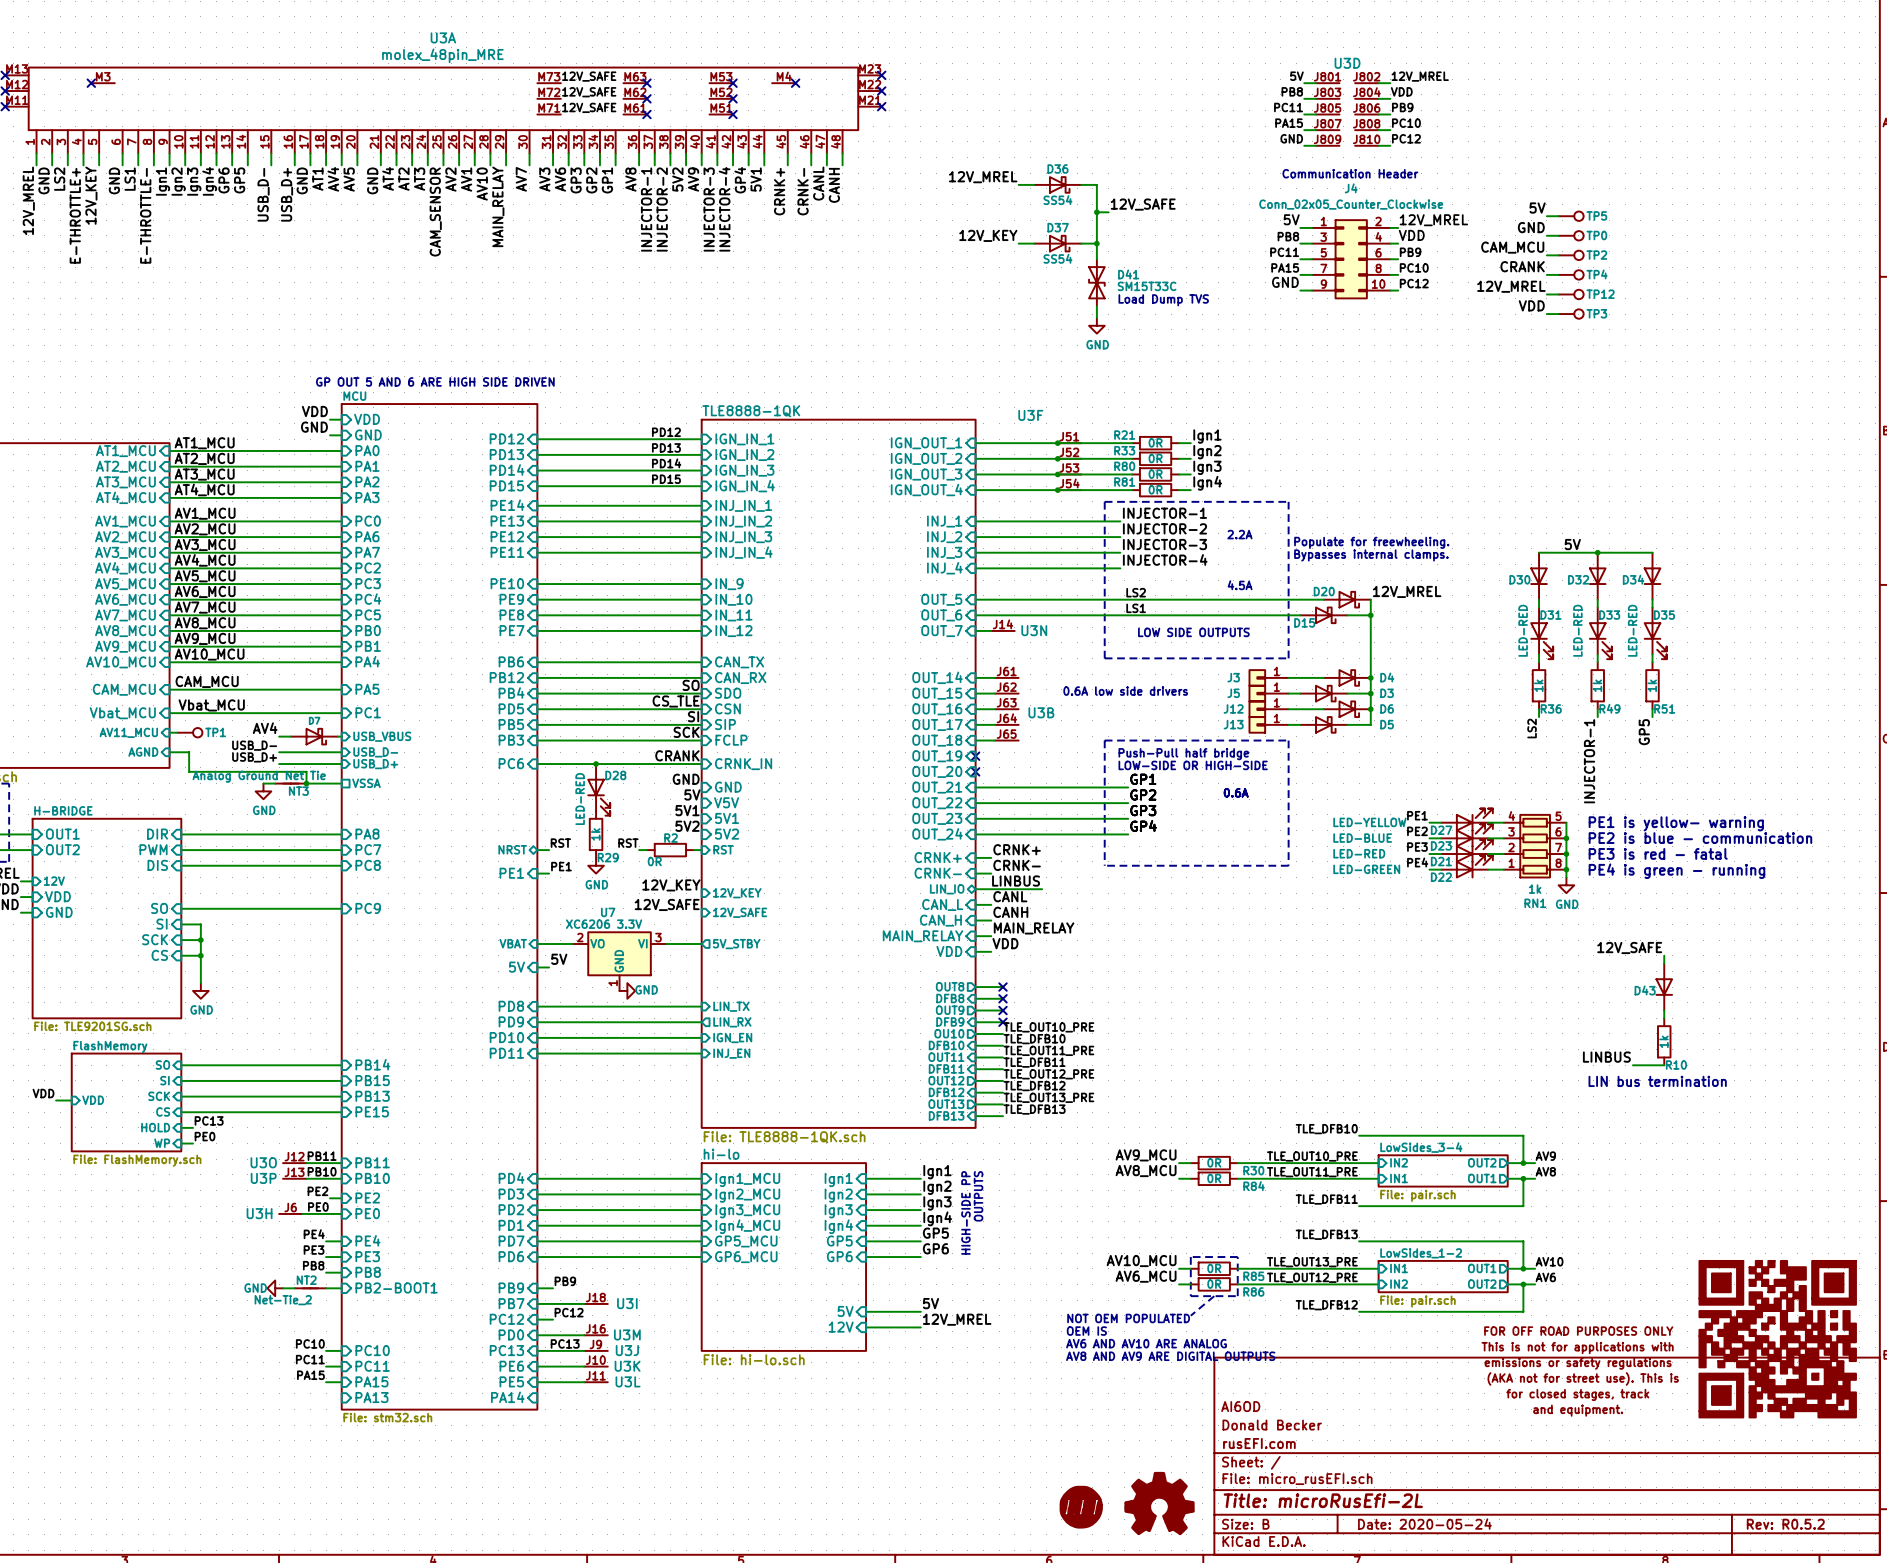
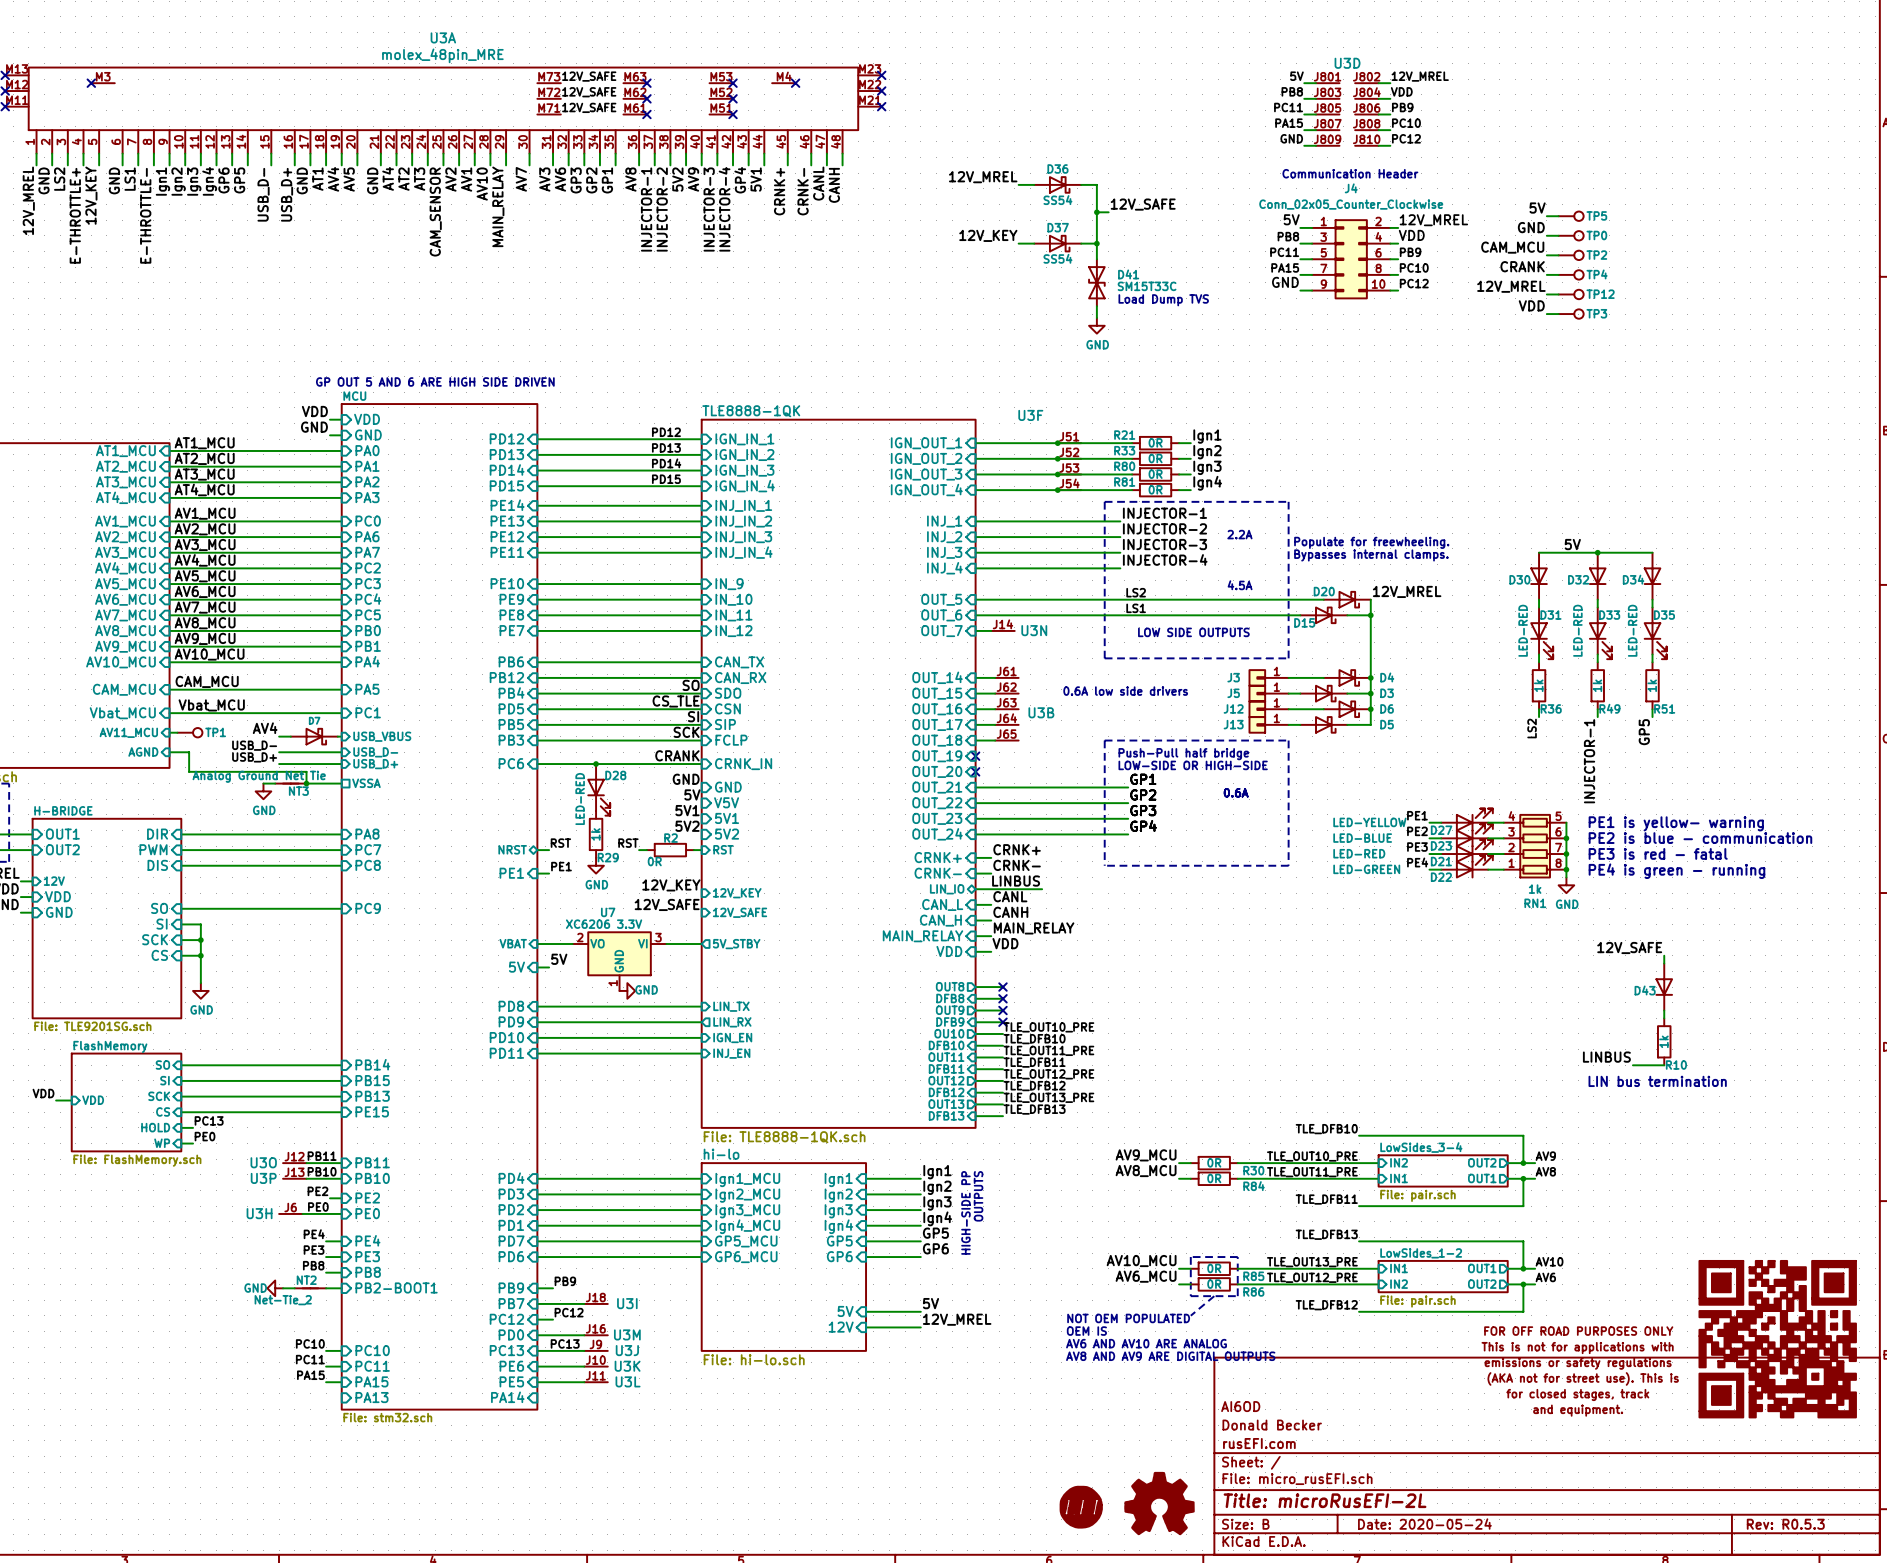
title block: Title: microRusEfi-2L (1323, 1500) -> Title: microRusEFI-2L (1325, 1500)
title block: Rev: R0.5.2 (1785, 1524) -> Rev: R0.5.3 (1785, 1524)

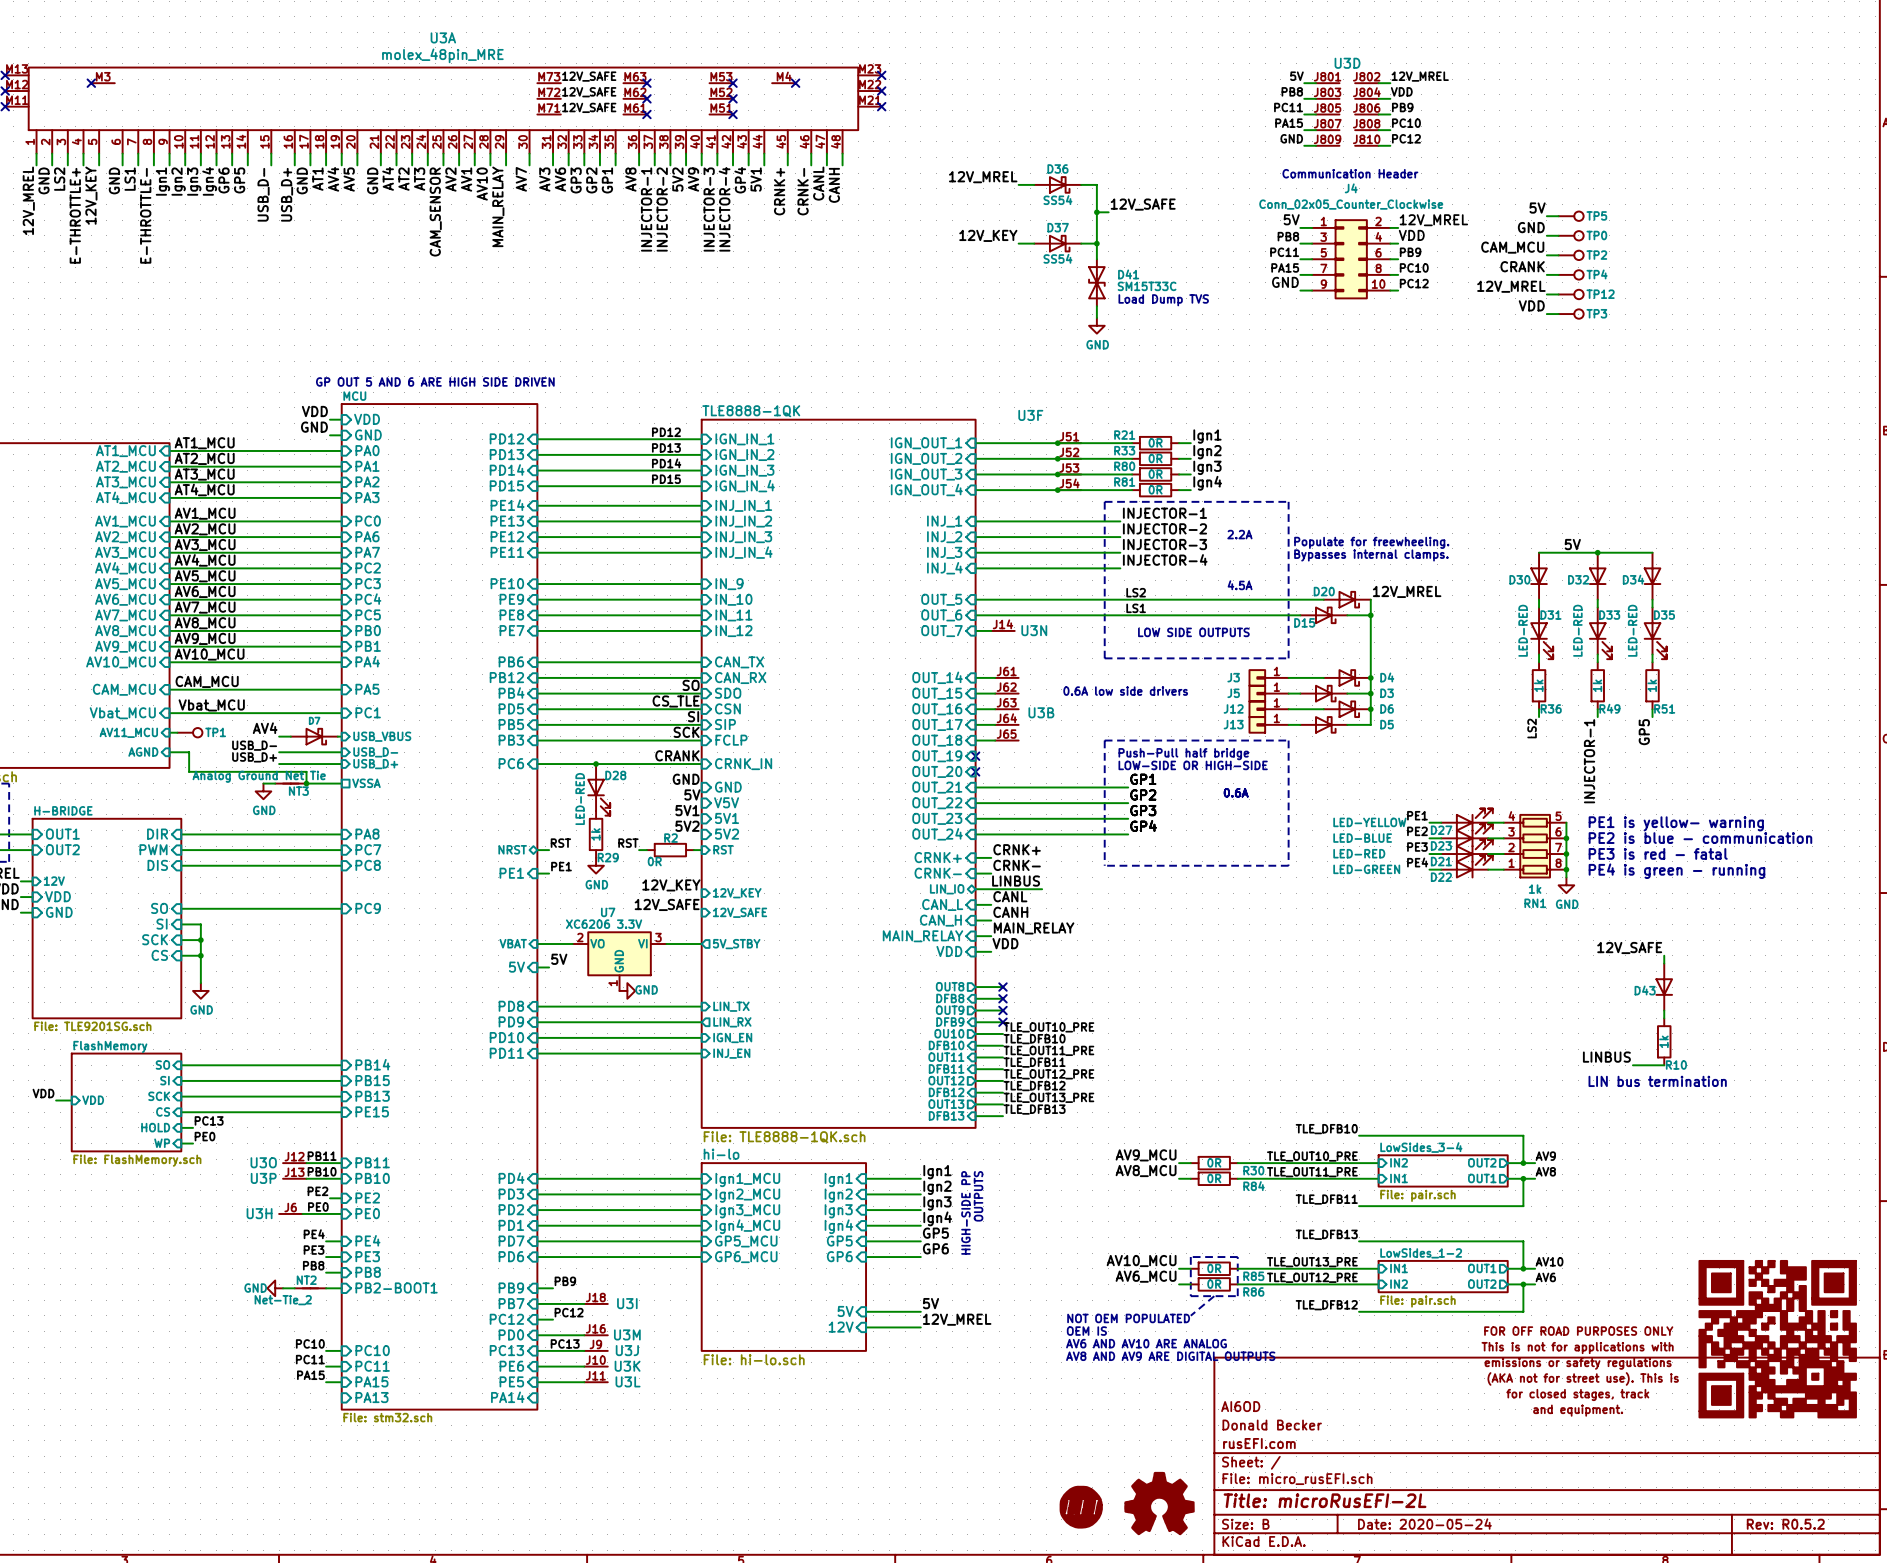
title block: Rev: R0.5.3 (1785, 1524) -> Rev: R0.5.2 (1785, 1524)

